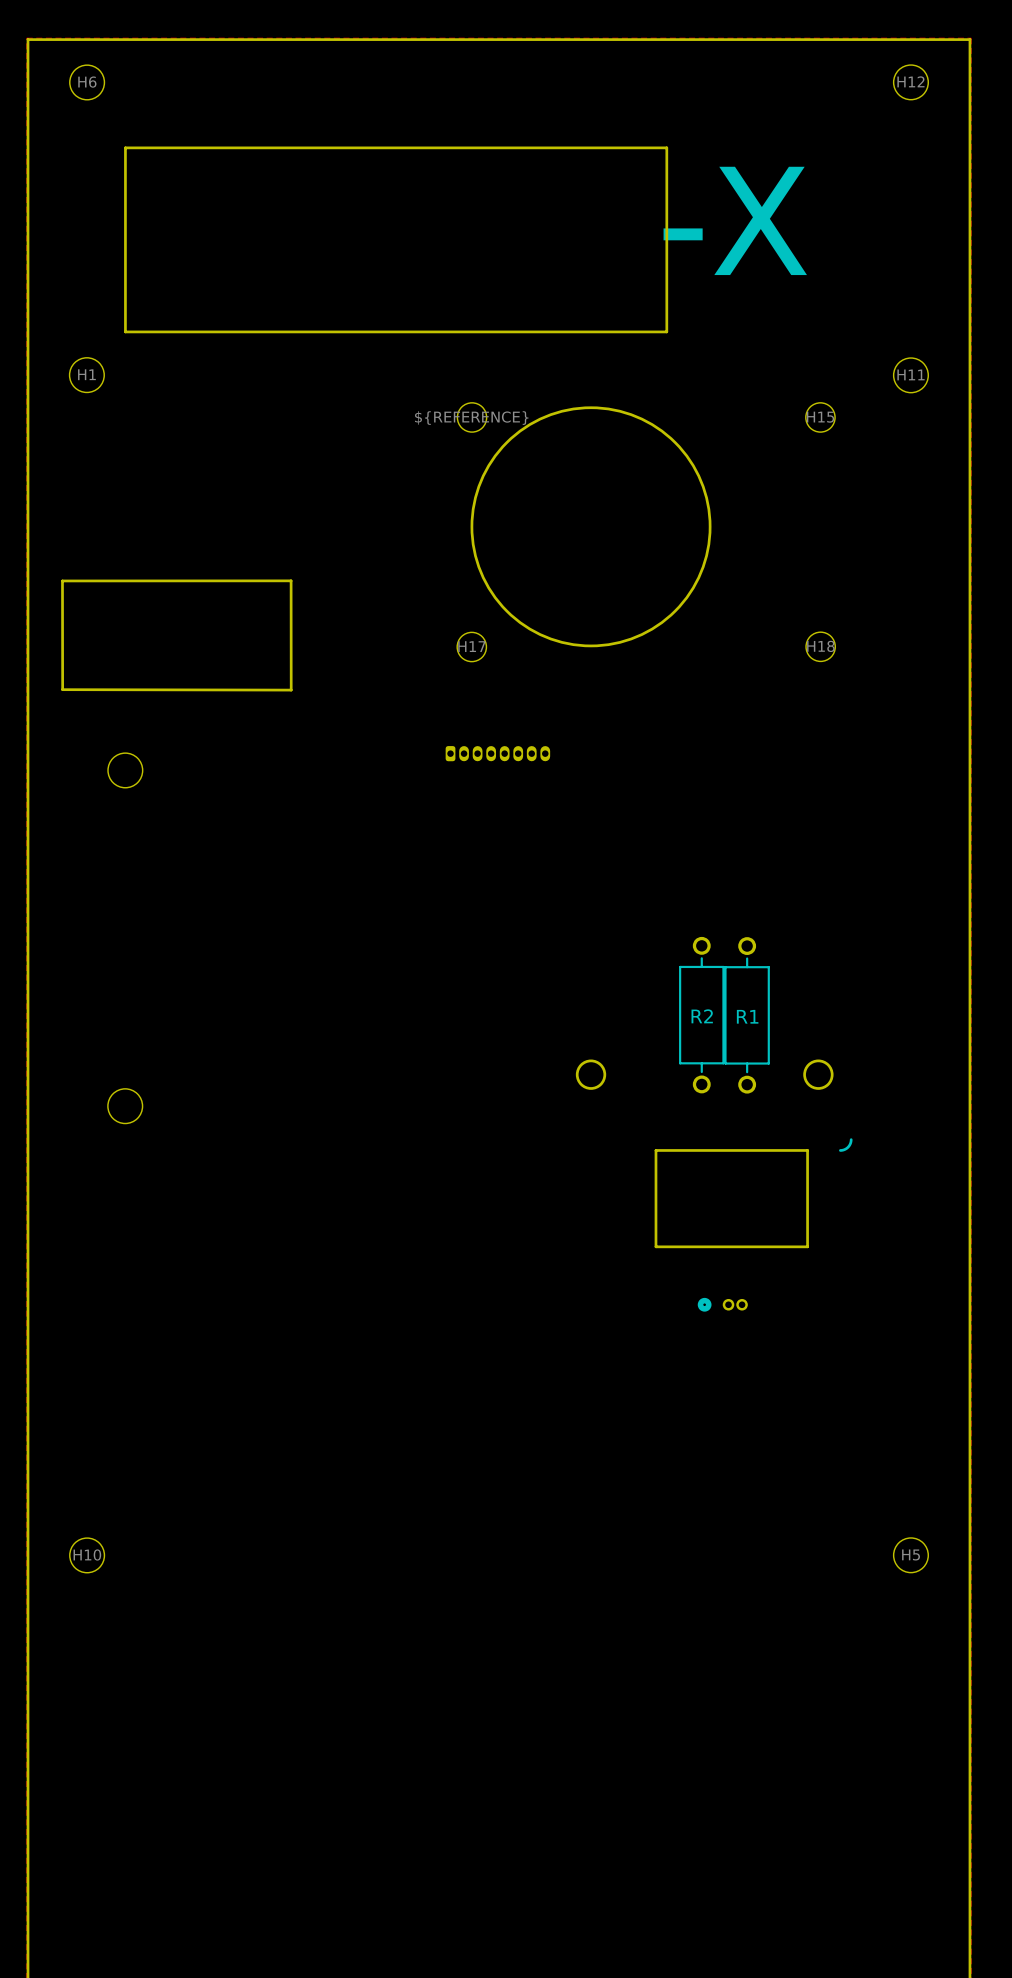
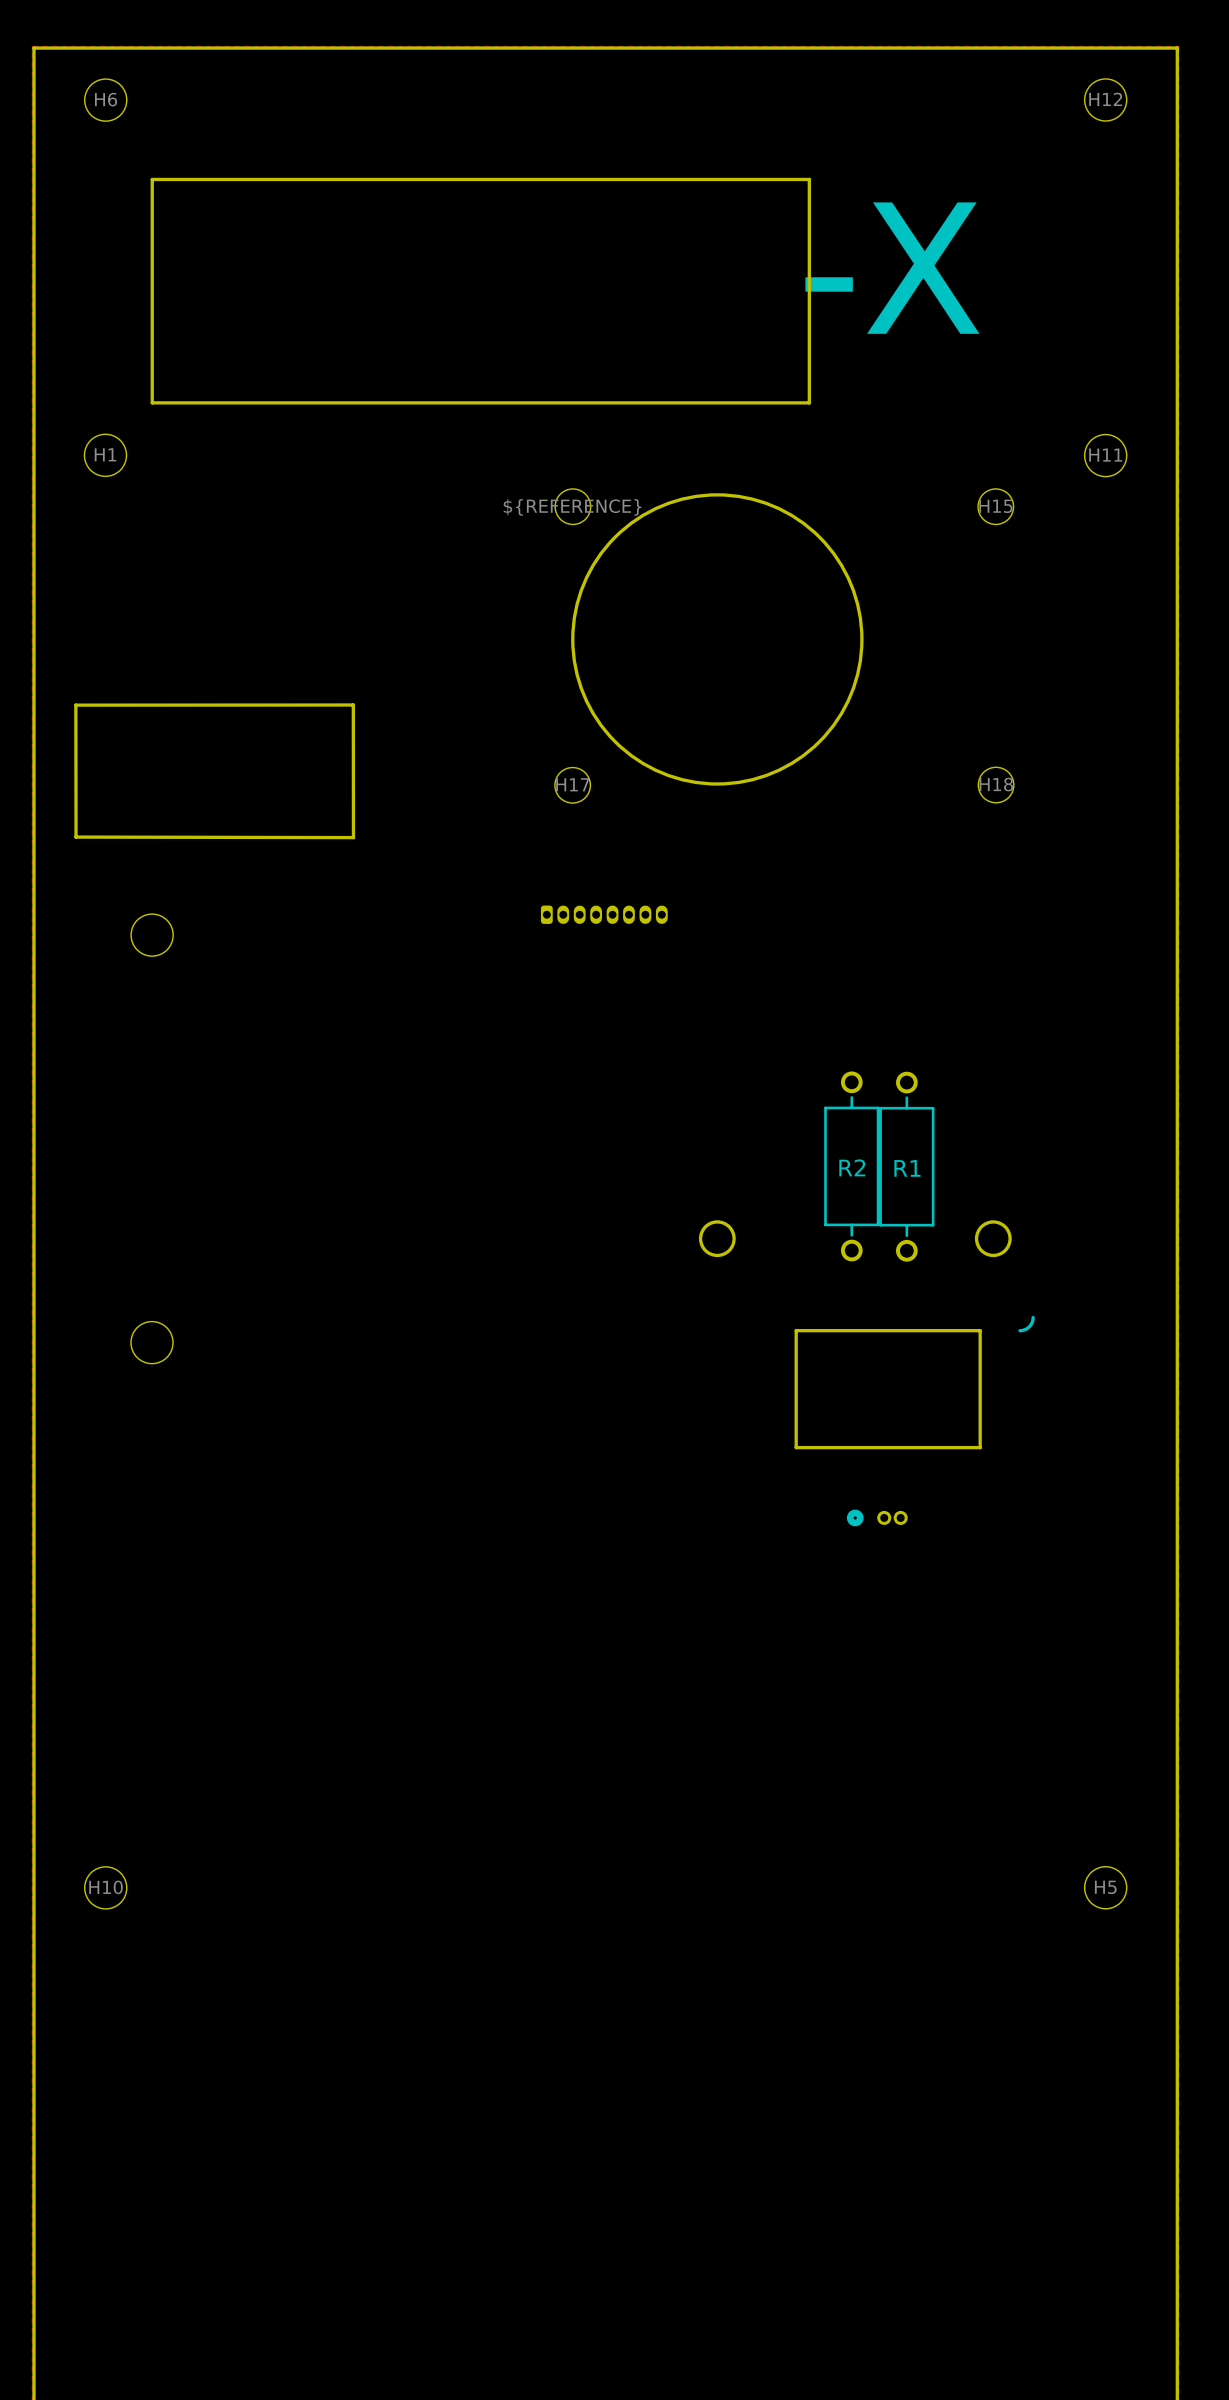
R2 position: (701, 1015) -> (851, 1166)
R1 position: (747, 1015) -> (906, 1166)
round board edge position: (591, 1074) -> (717, 1238)
round board edge position: (818, 1074) -> (993, 1238)
line: (851, 1139) (848, 1147) (840, 1150) -> (1033, 1317) (1029, 1326) (1019, 1330)
board edge: (655, 1150) (807, 1150) -> (796, 1396) (796, 1330) (980, 1330) (980, 1396)
board edge: (655, 1192) (655, 1246) (807, 1246) (807, 1192) -> (796, 1447) (980, 1447)
part position: (722, 1304) -> (877, 1517)

